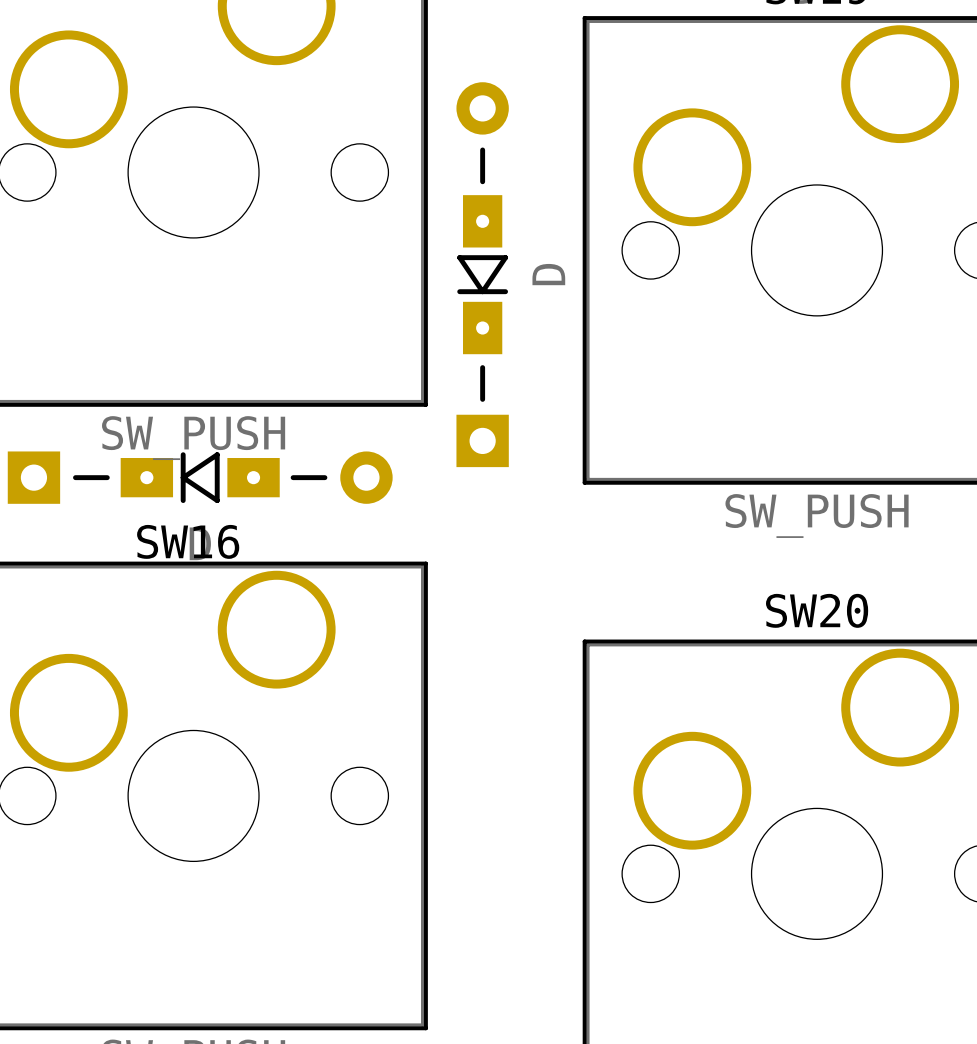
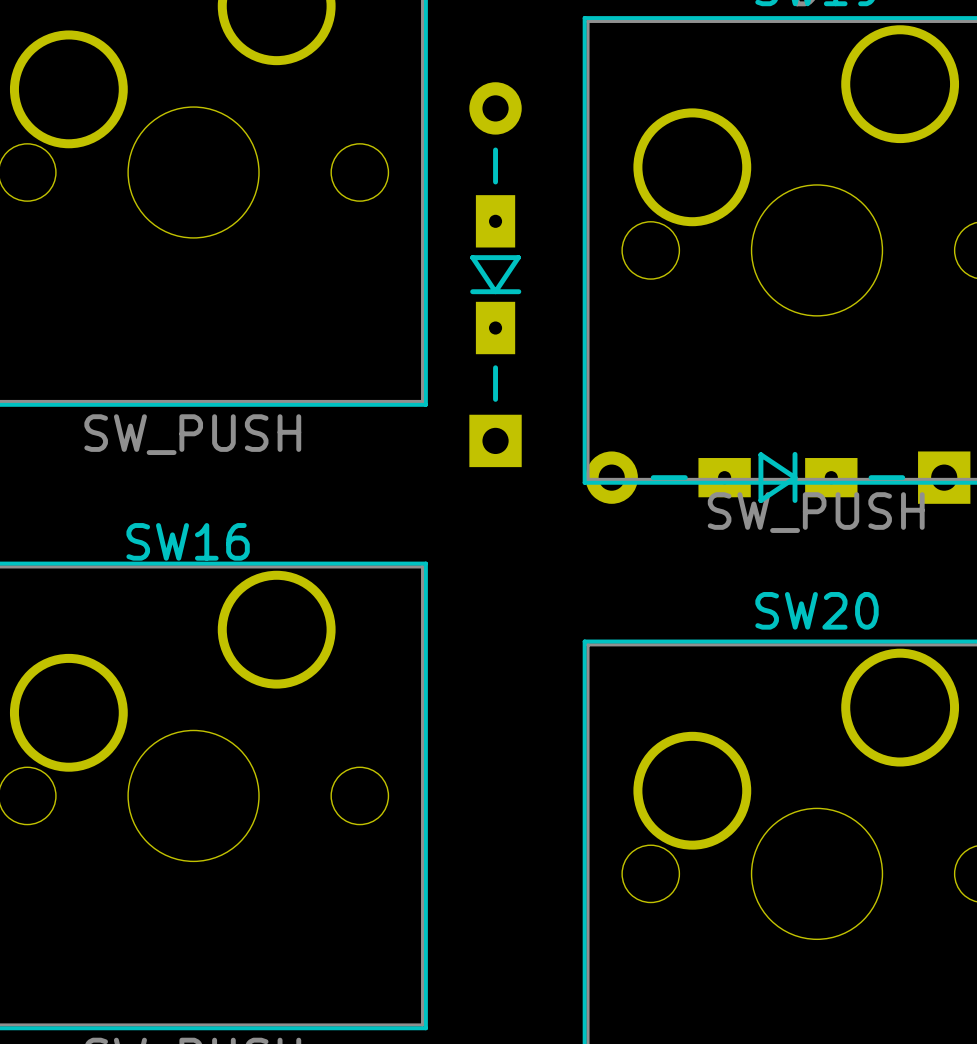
part side: top (482, 274) -> bottom (495, 274)
part side: top (200, 477) -> bottom (777, 477)

